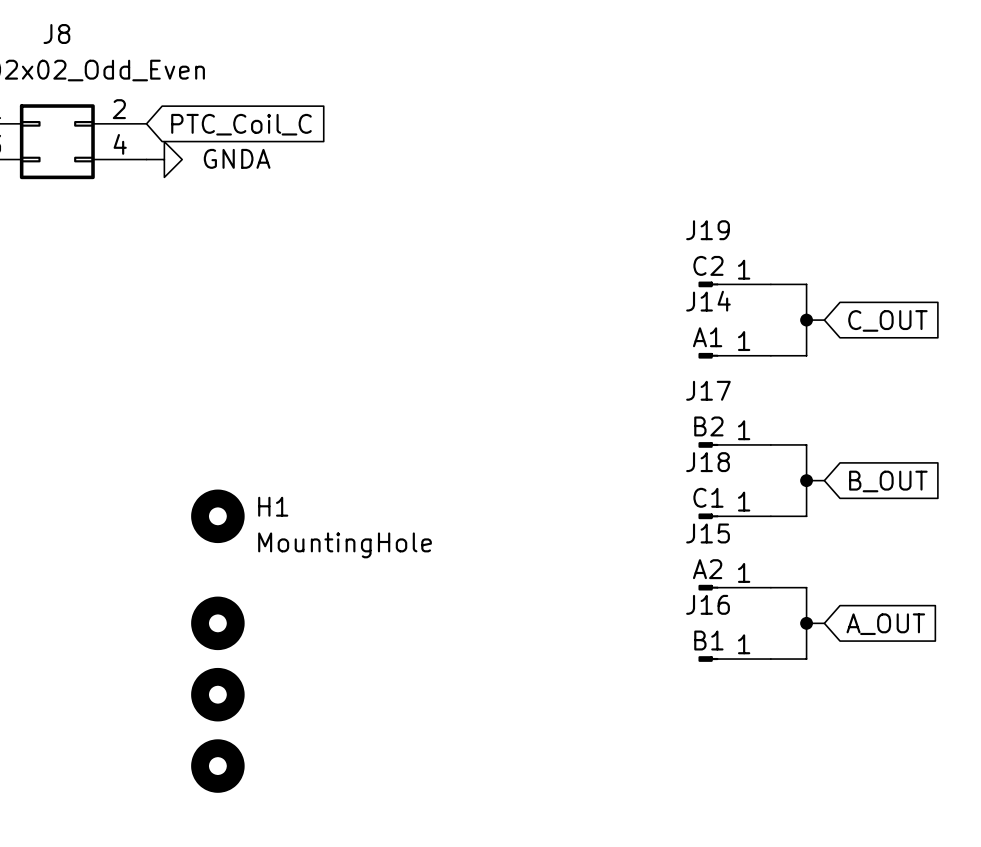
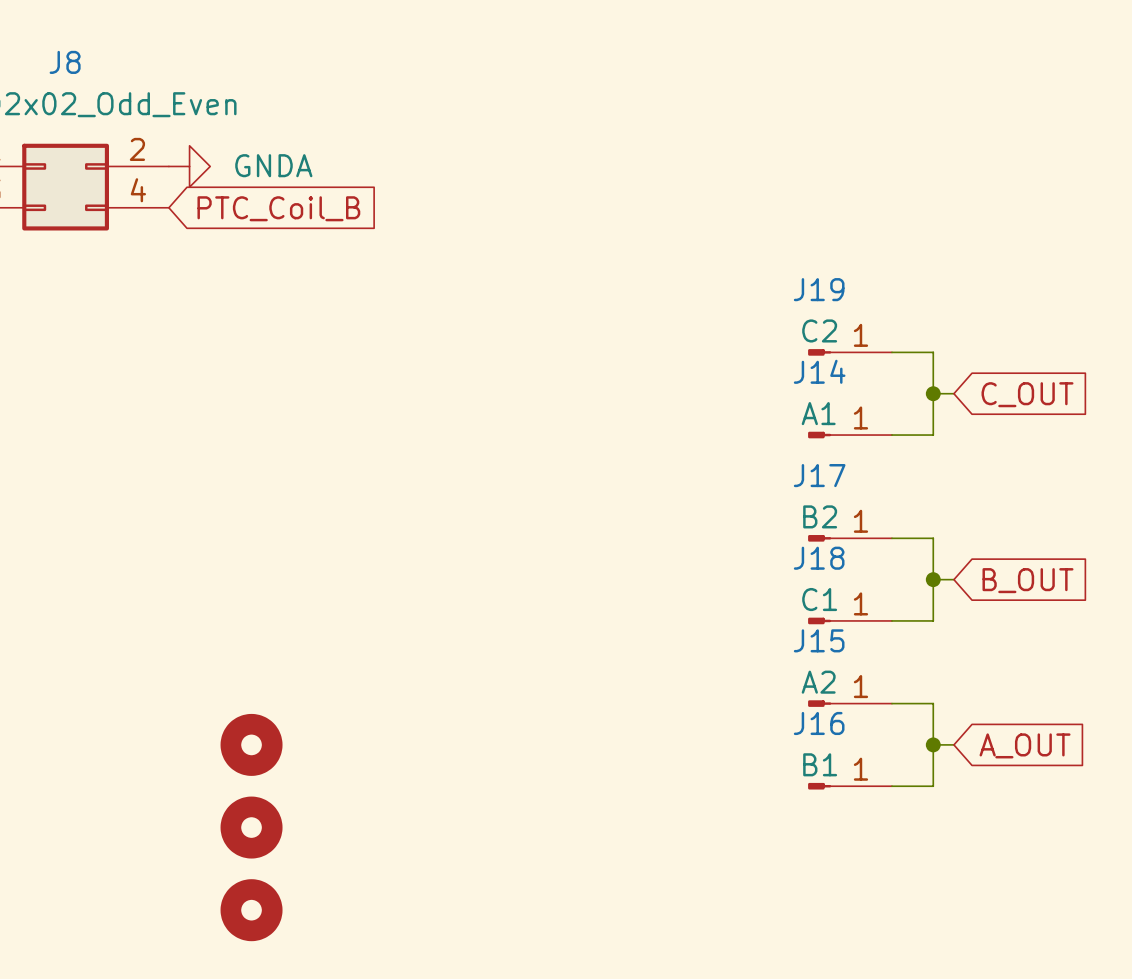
global label: PTC_Coil_C (241, 124) -> PTC_Coil_B (278, 208)
power symbol position: GNDA (164, 159) -> GNDA (189, 166)
H1: MountingHole (217, 516) -> none

